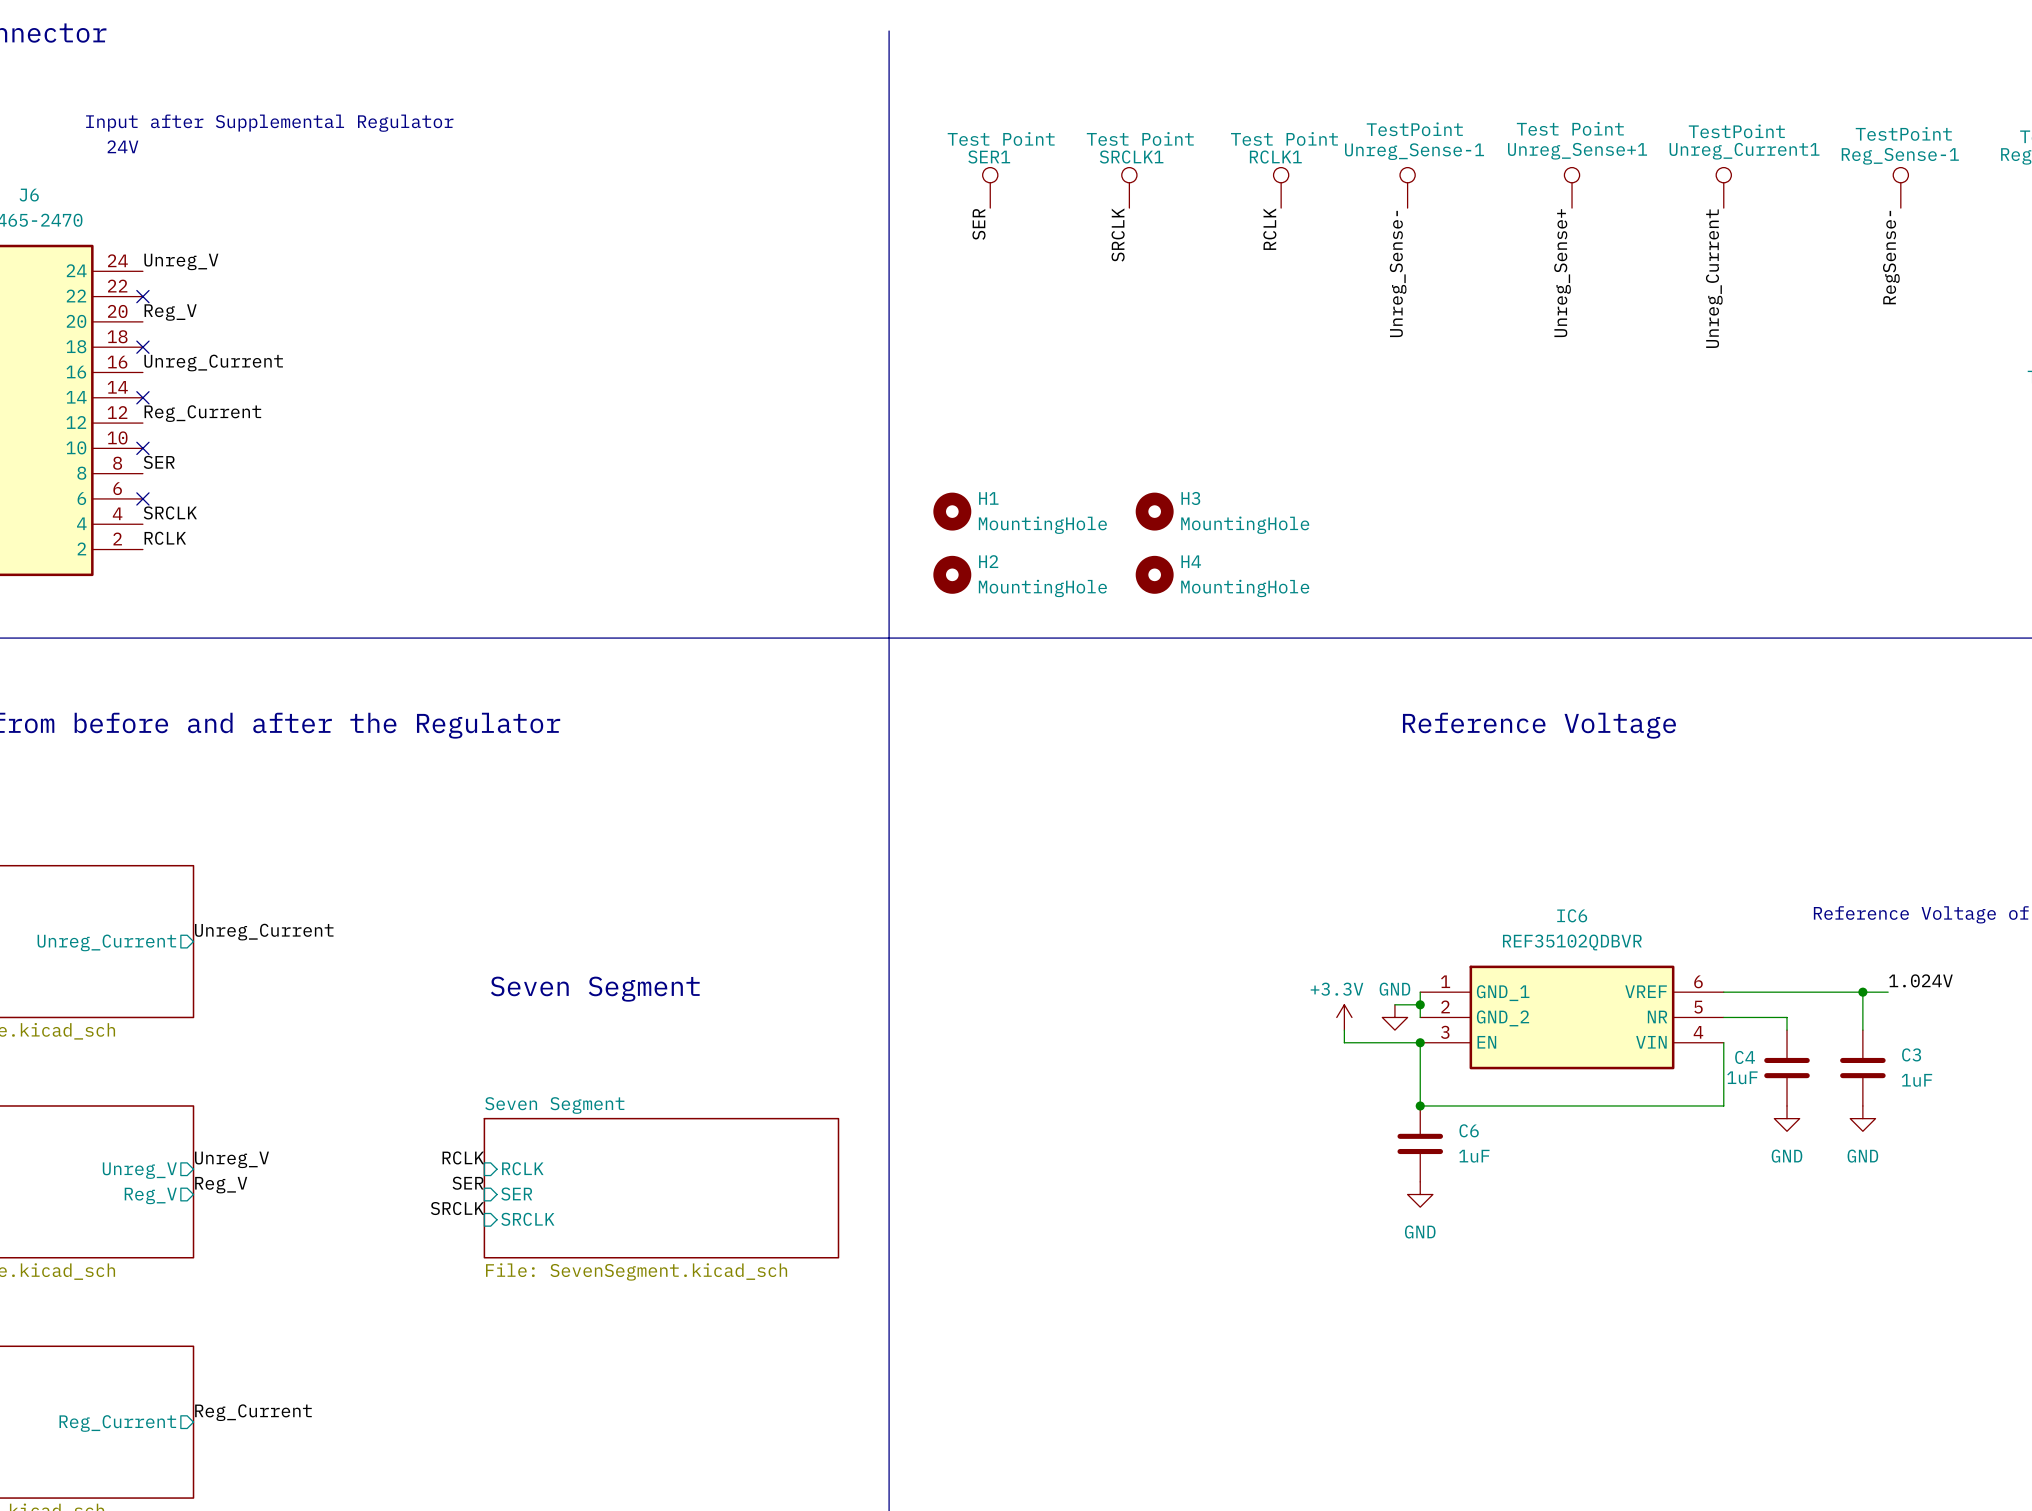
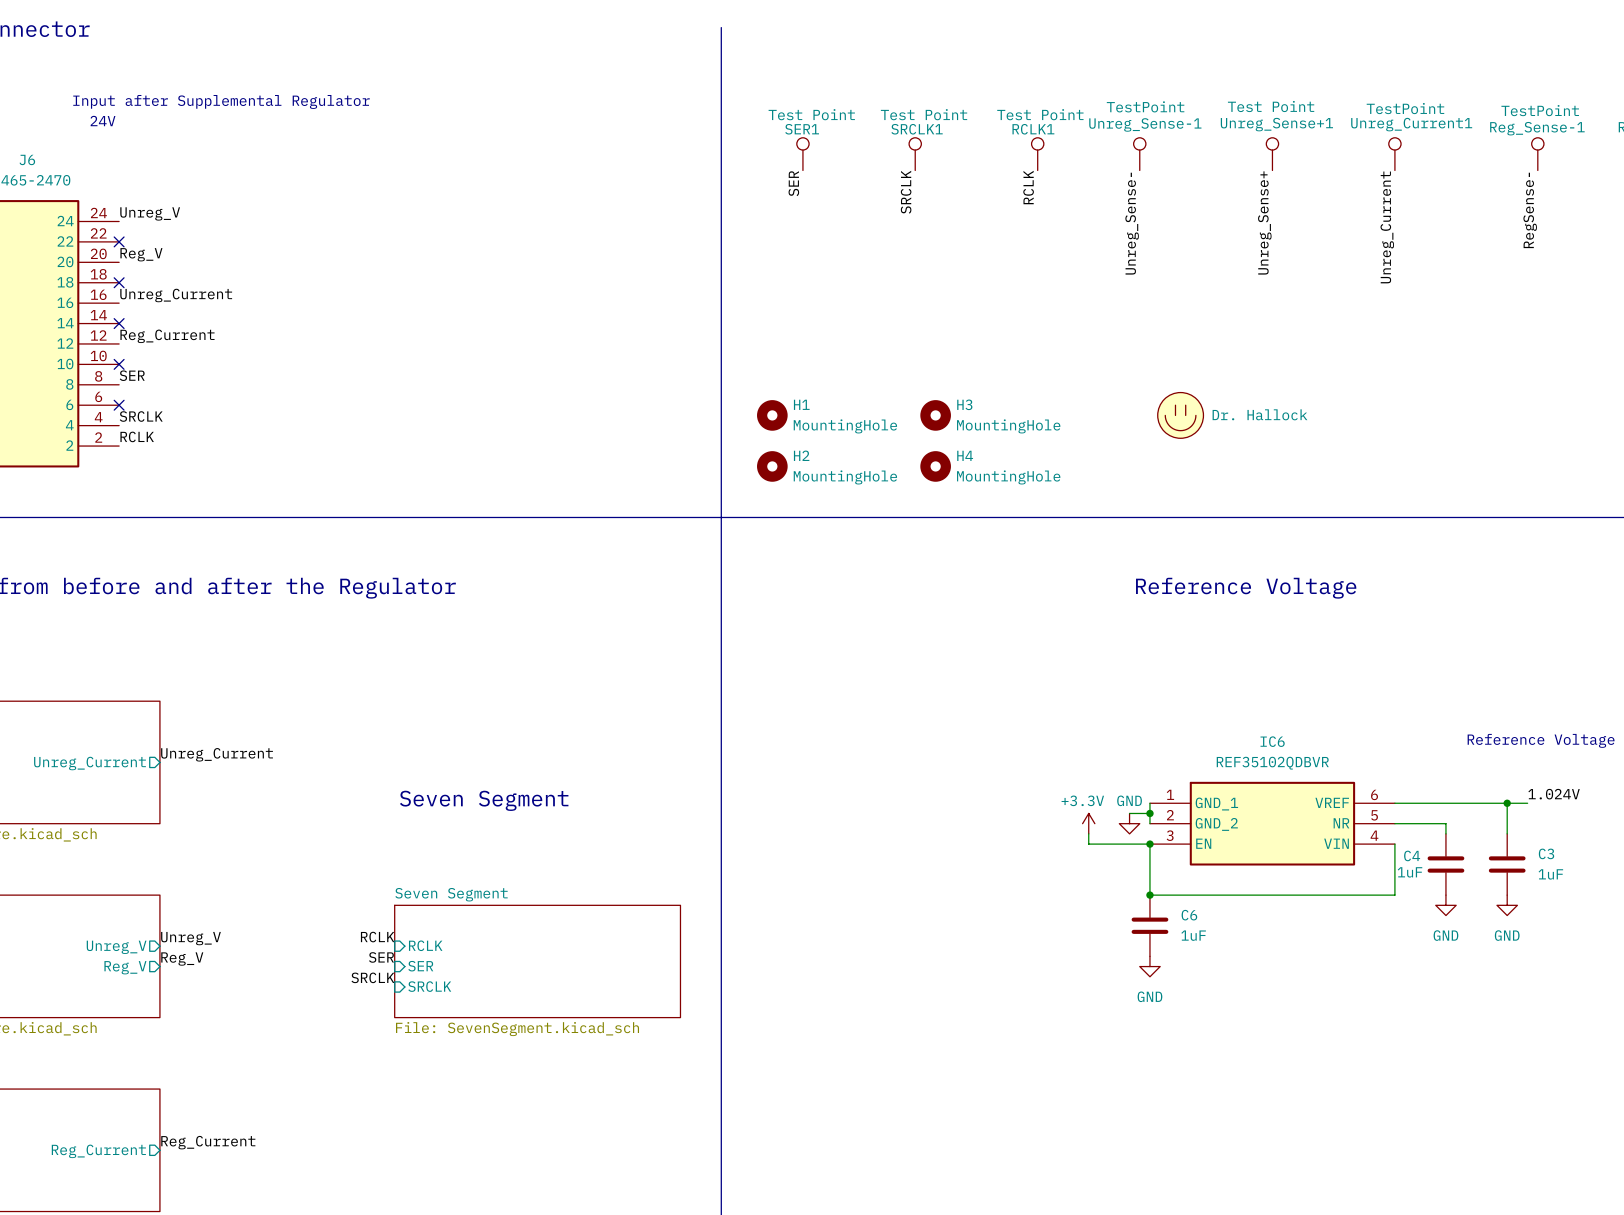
part: none -> Dr. Hallock (1180, 415)

